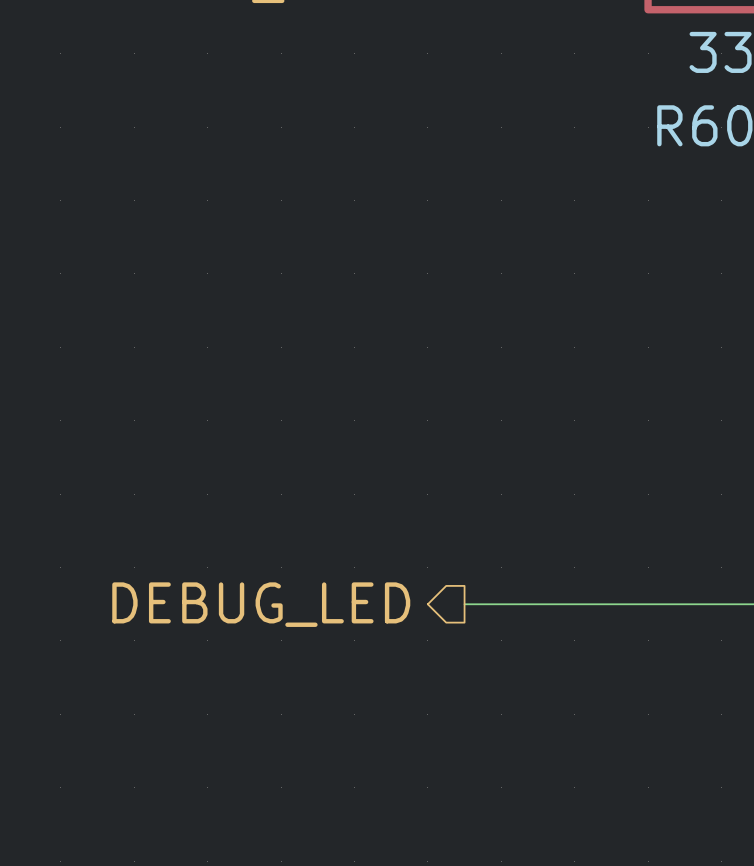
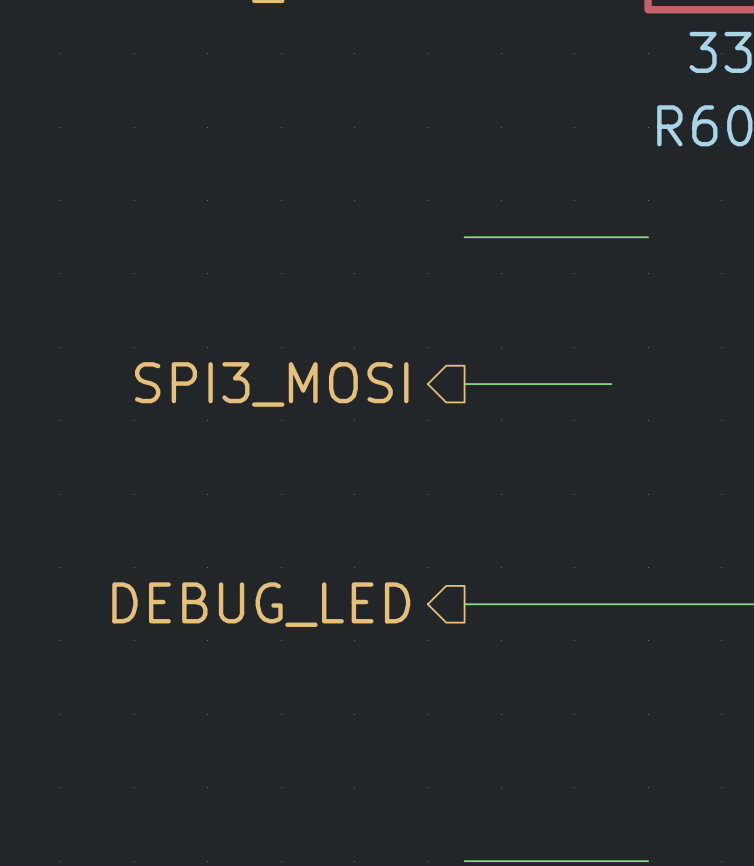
wire: none -> (464, 237) (648, 237)
hierarchical label: none -> SPI3_MOSI (271, 384)
wire: none -> (464, 384) (611, 384)
wire: none -> (464, 861) (648, 861)

